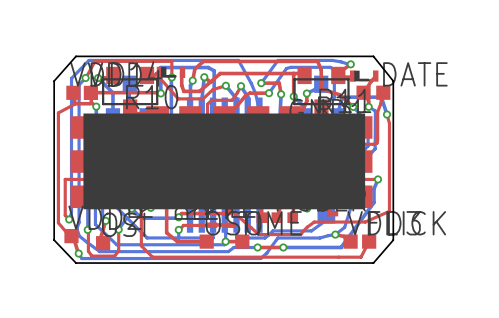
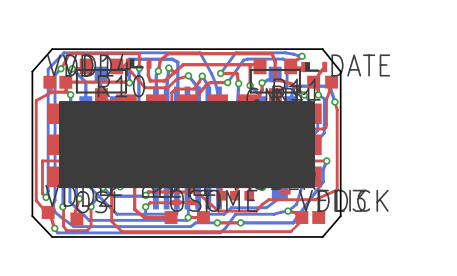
top track: (369, 241) (360, 257) (338, 257) -> (305, 217) (291, 231)

